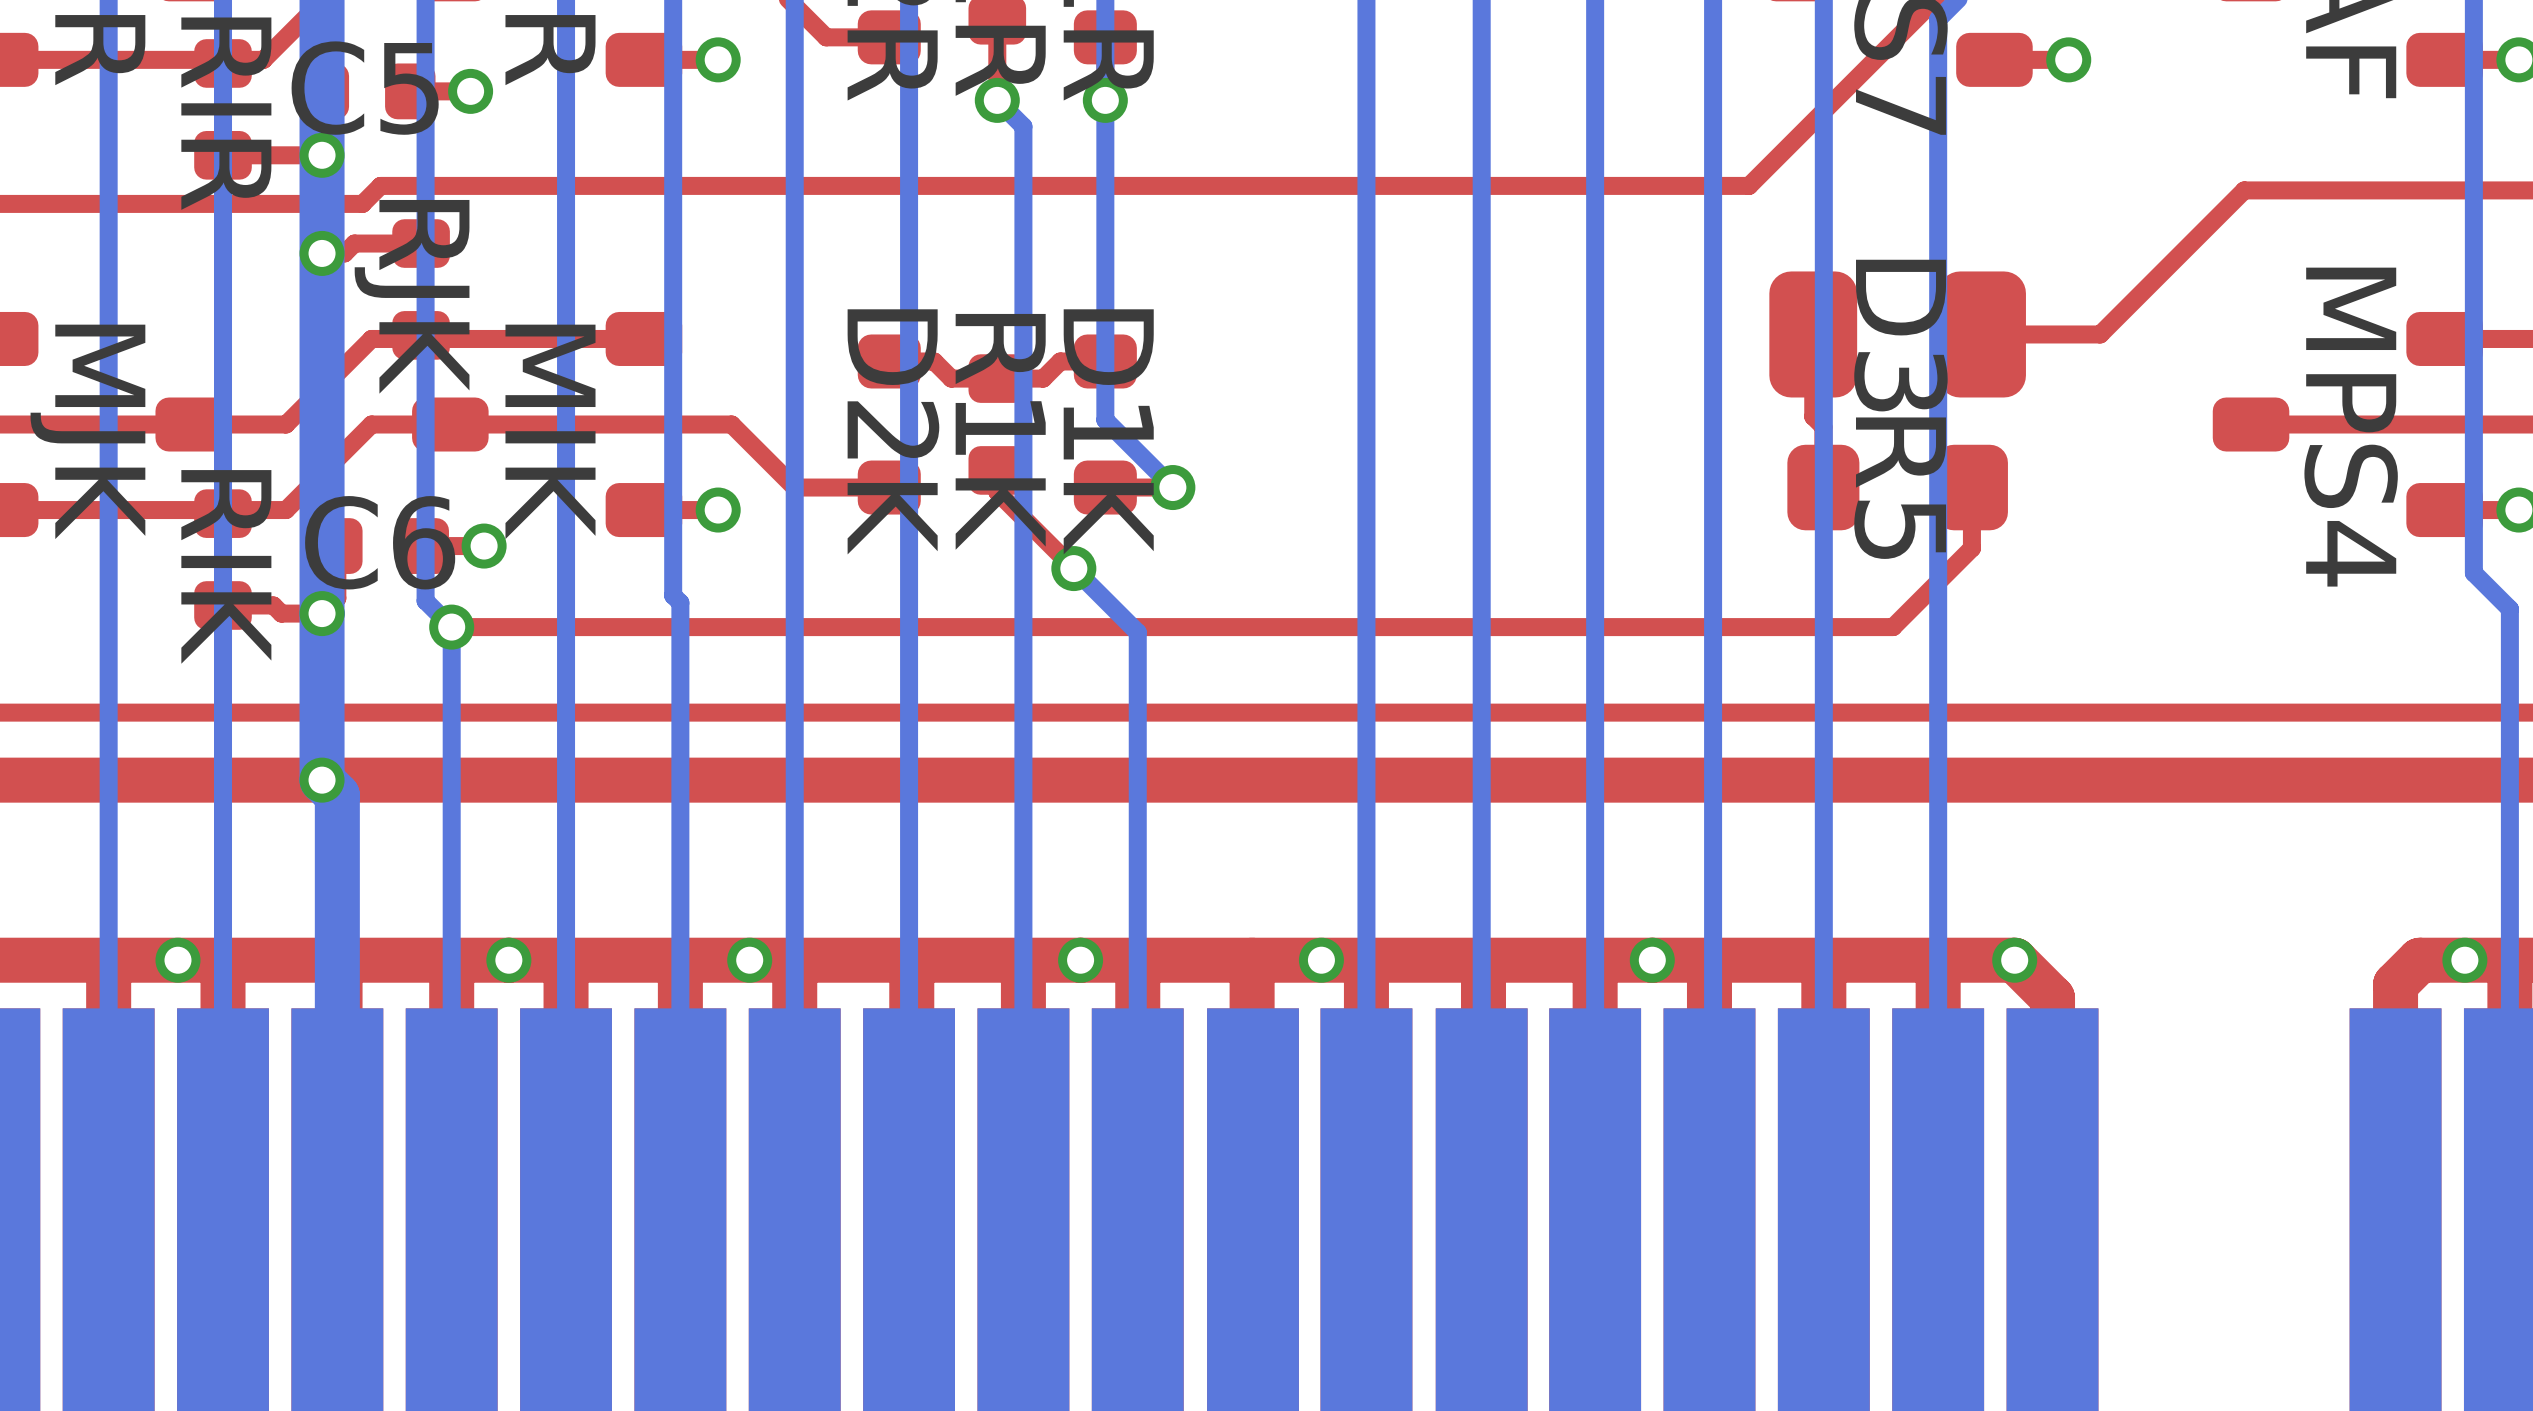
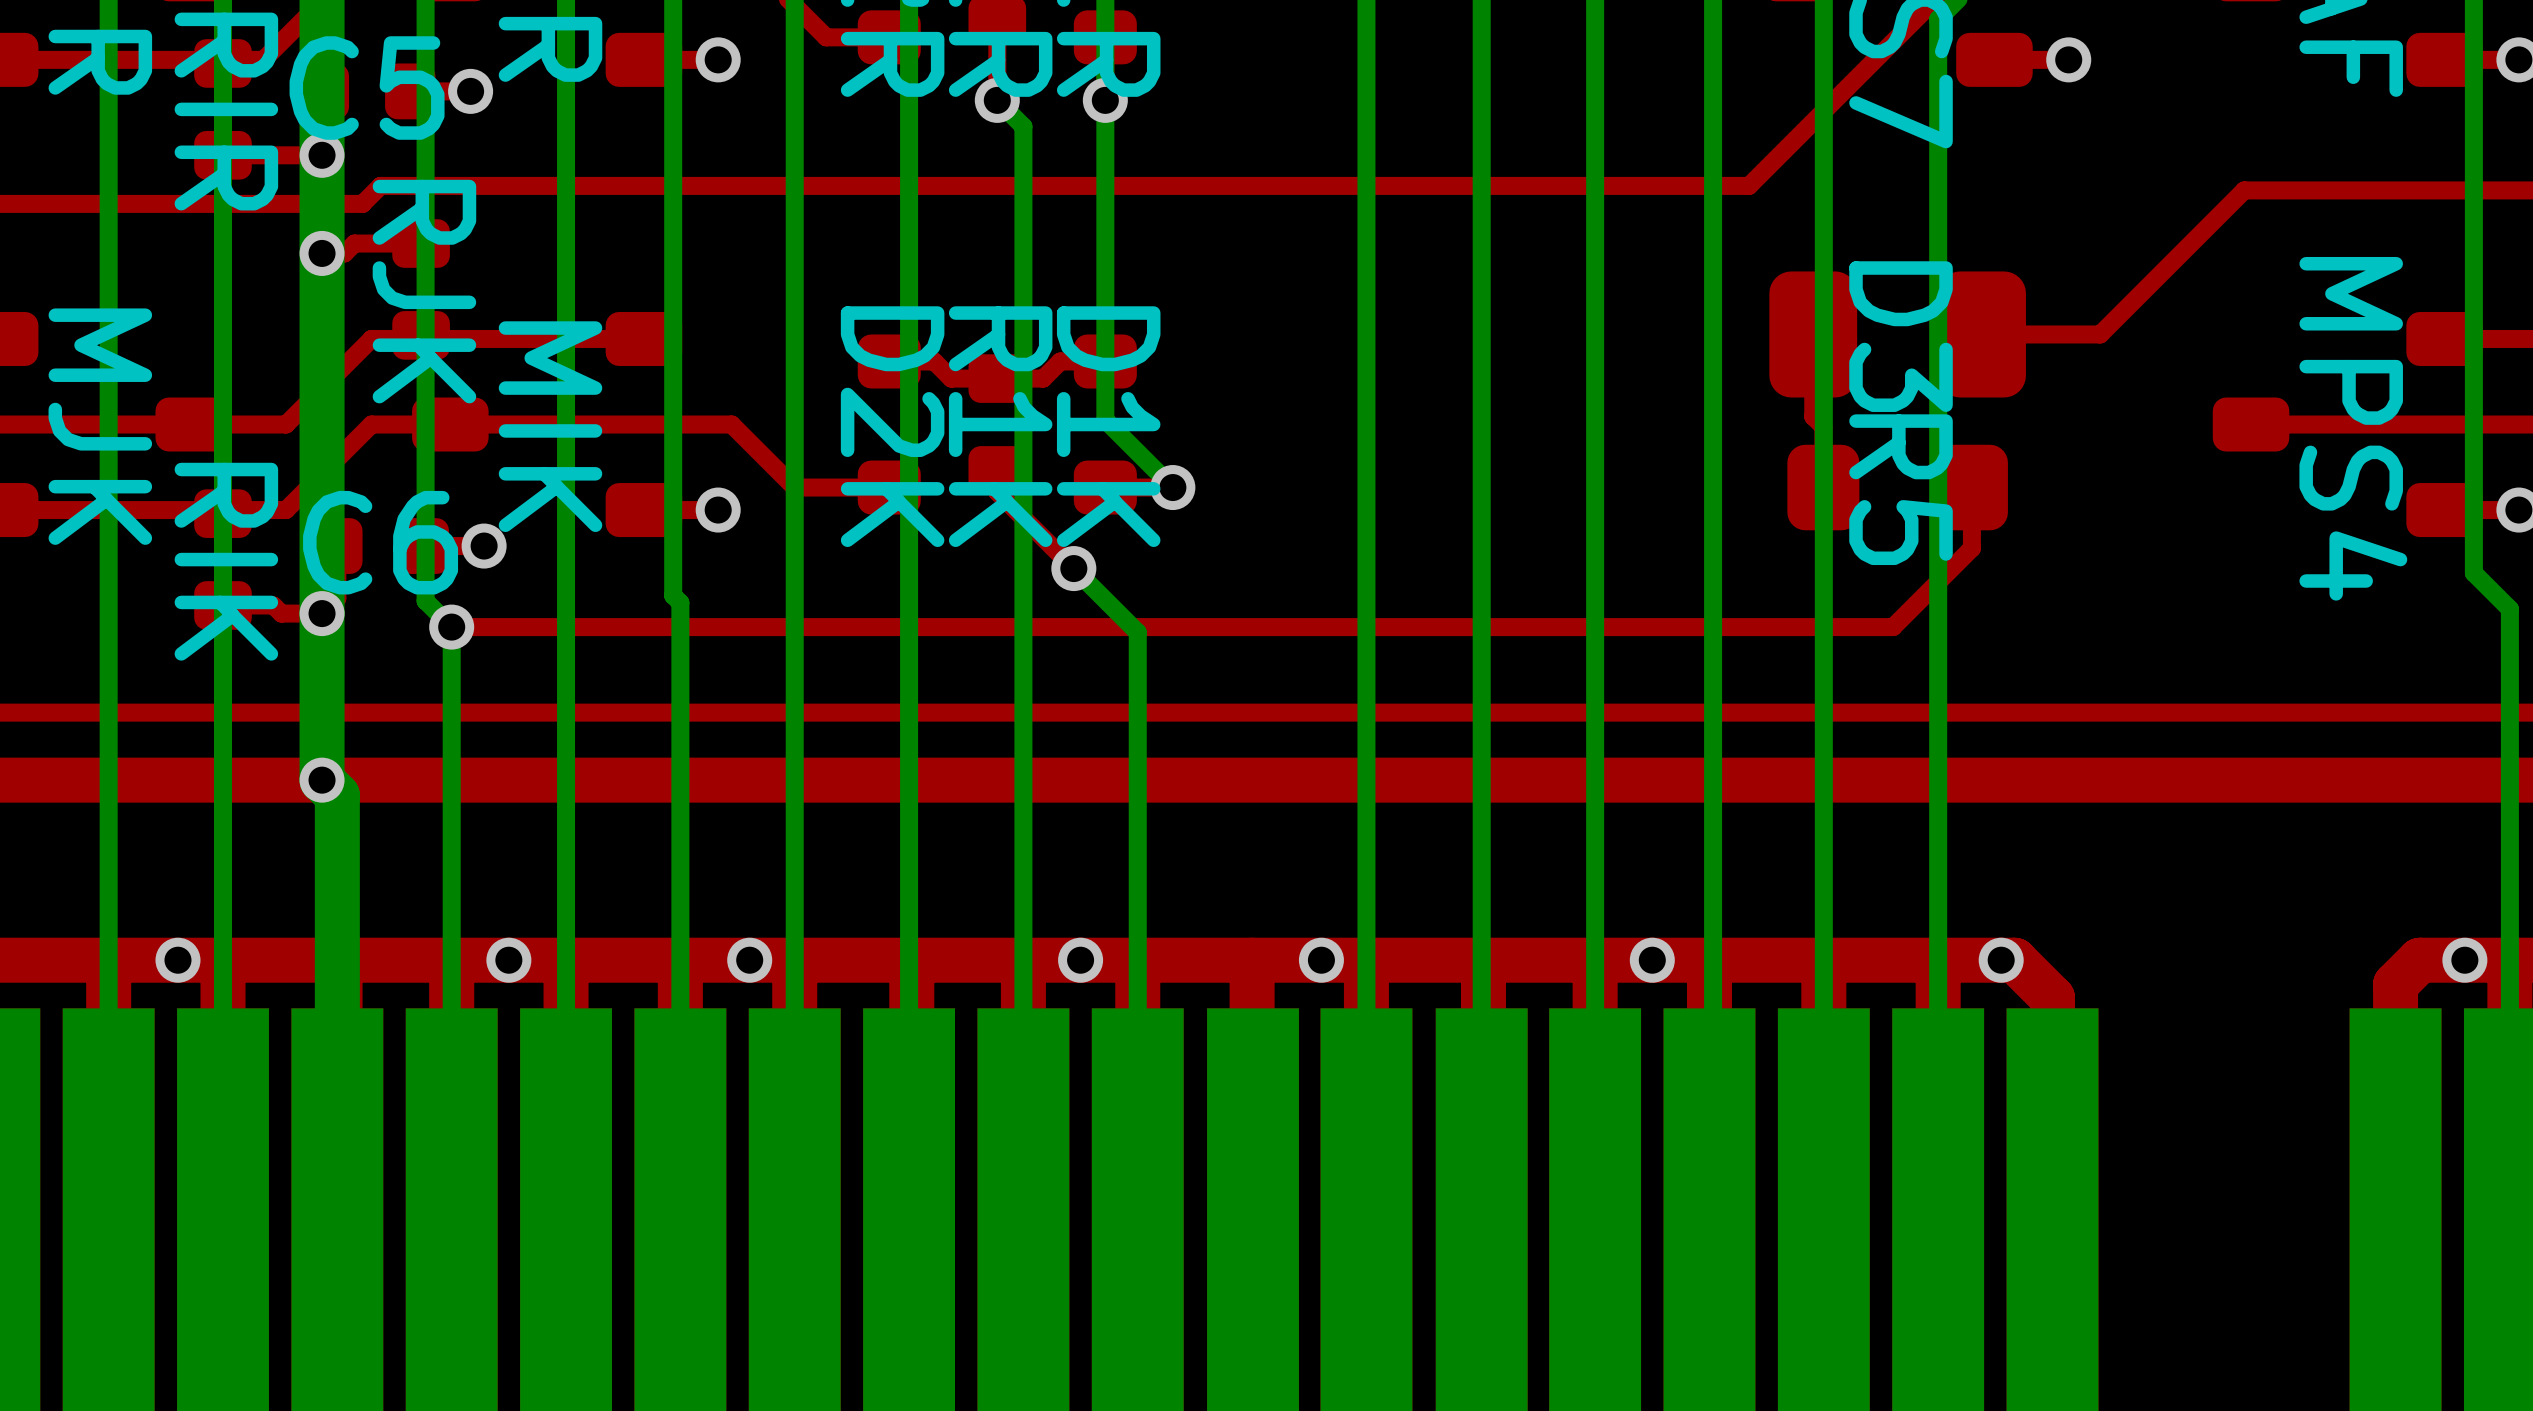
via position: (2014, 960) -> (2001, 960)

